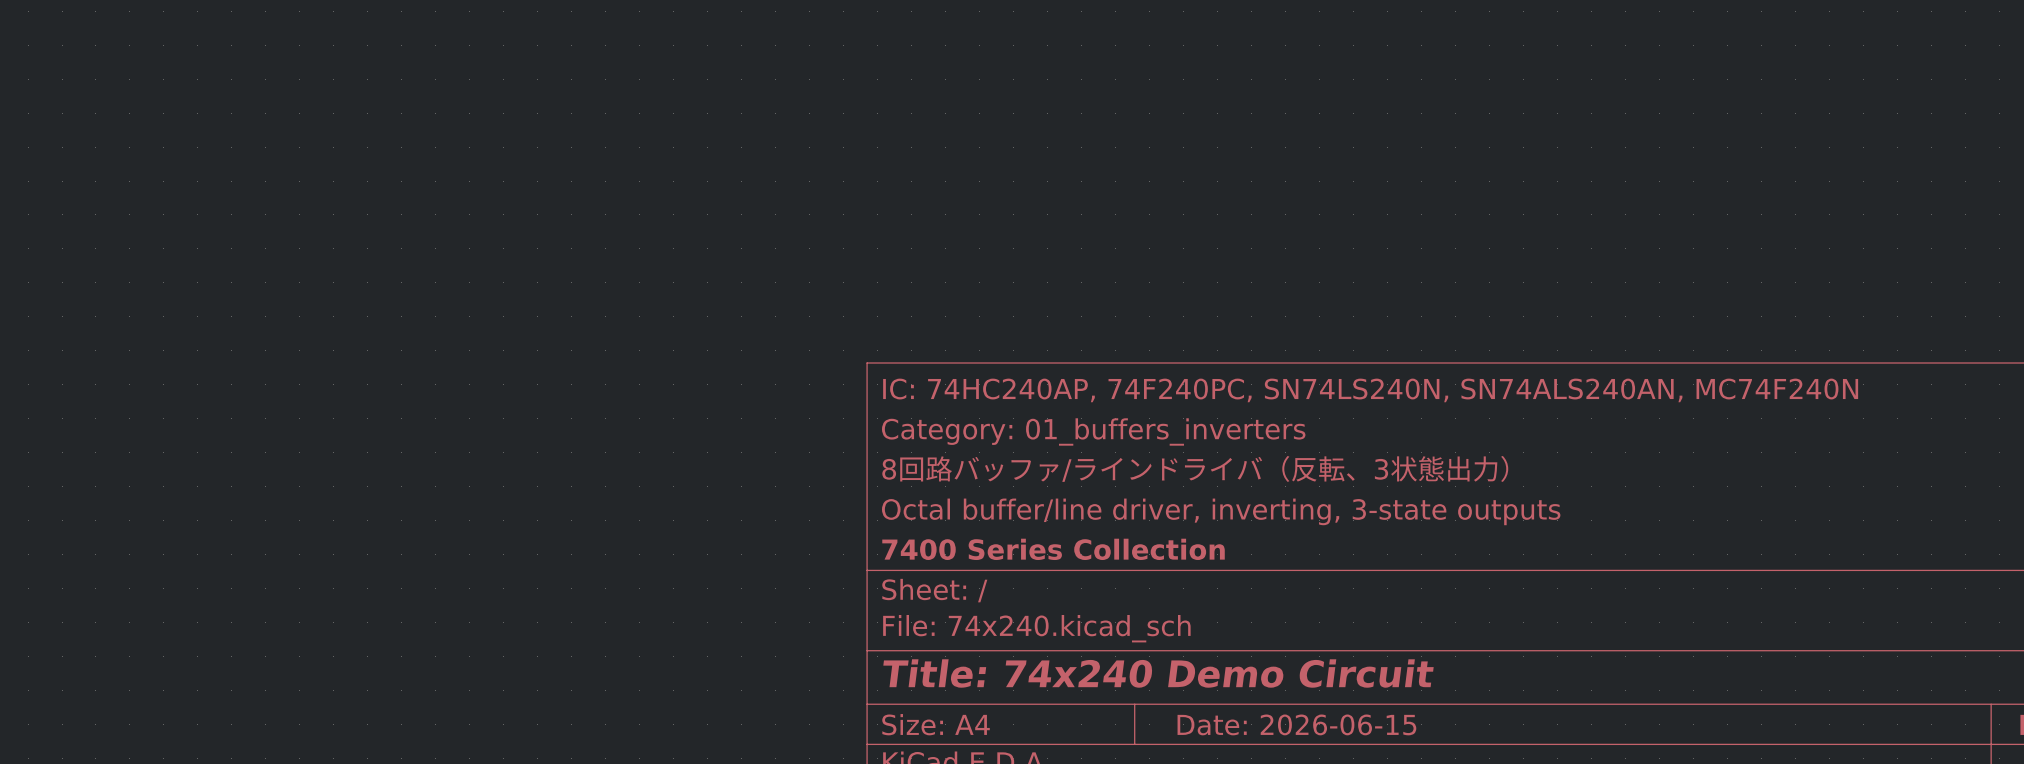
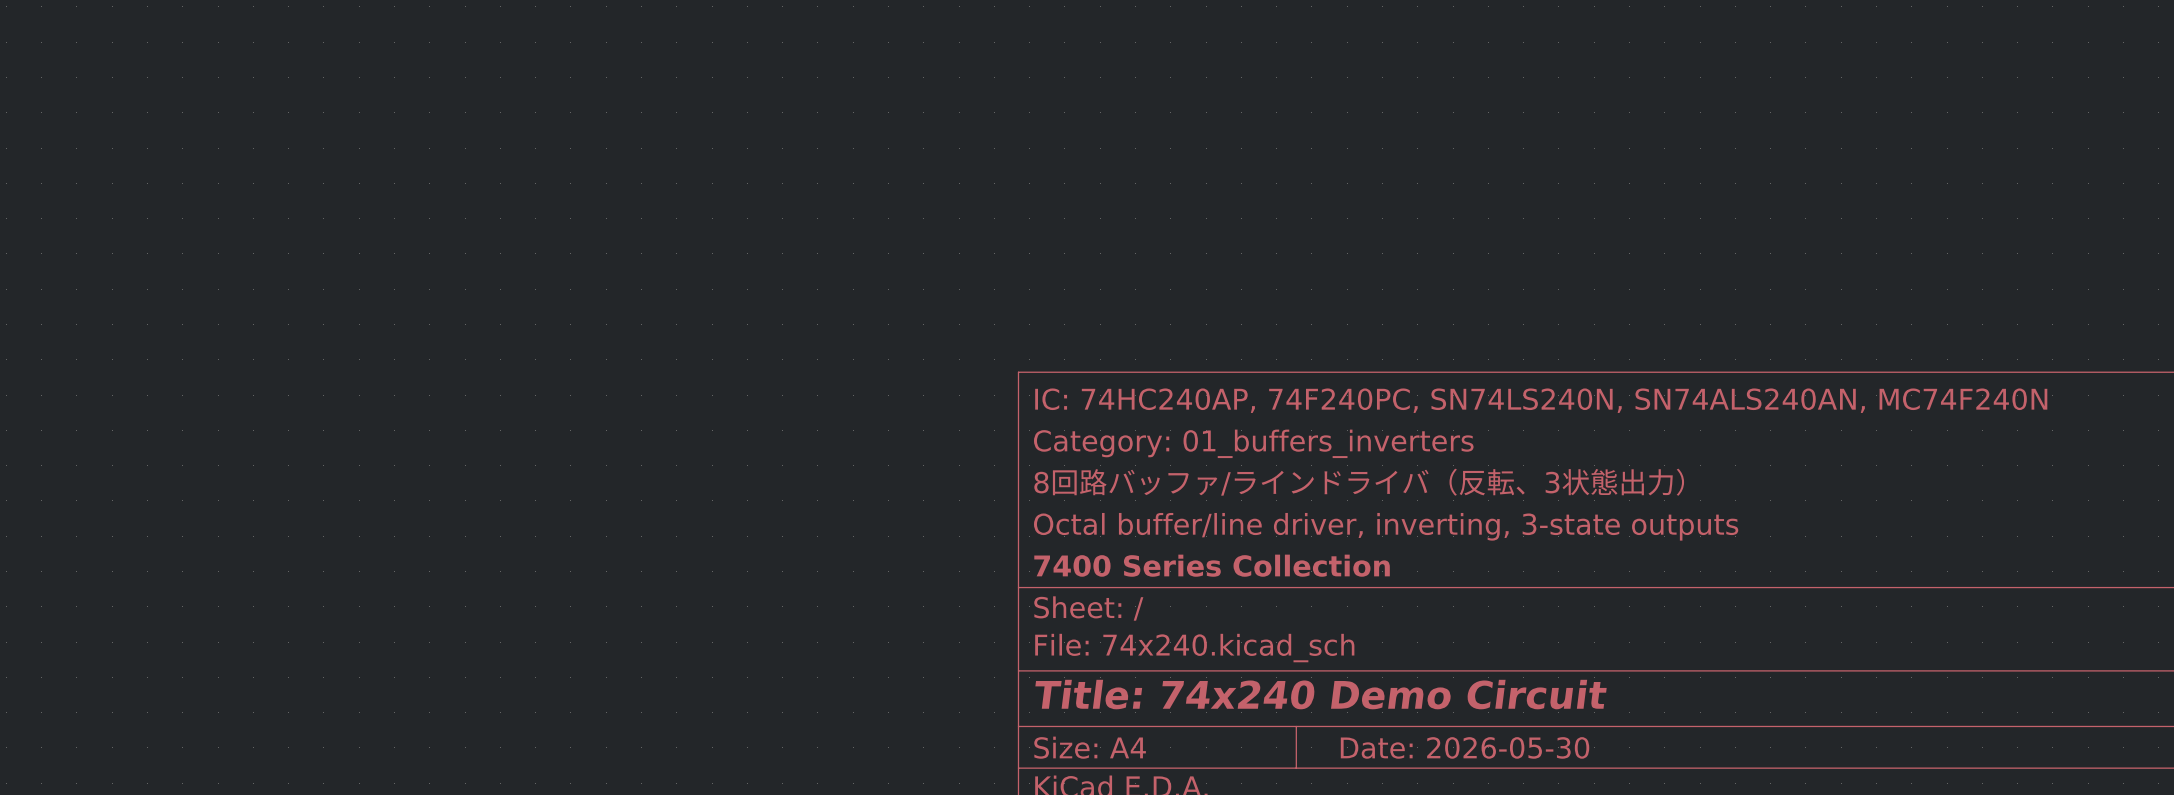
title block: Date: 2026-06-15 (1296, 724) -> Date: 2026-05-30 (1465, 747)

